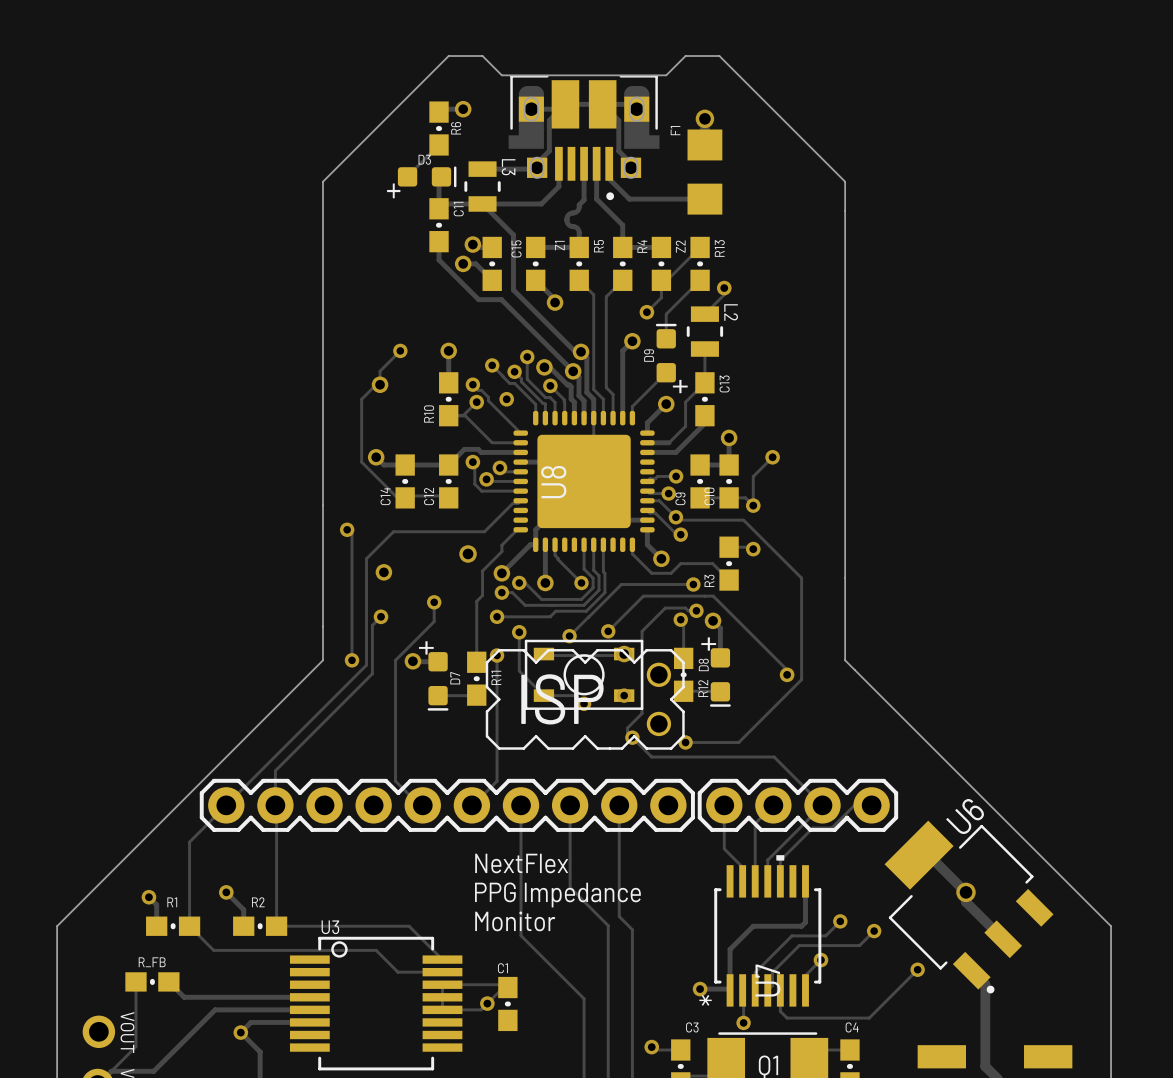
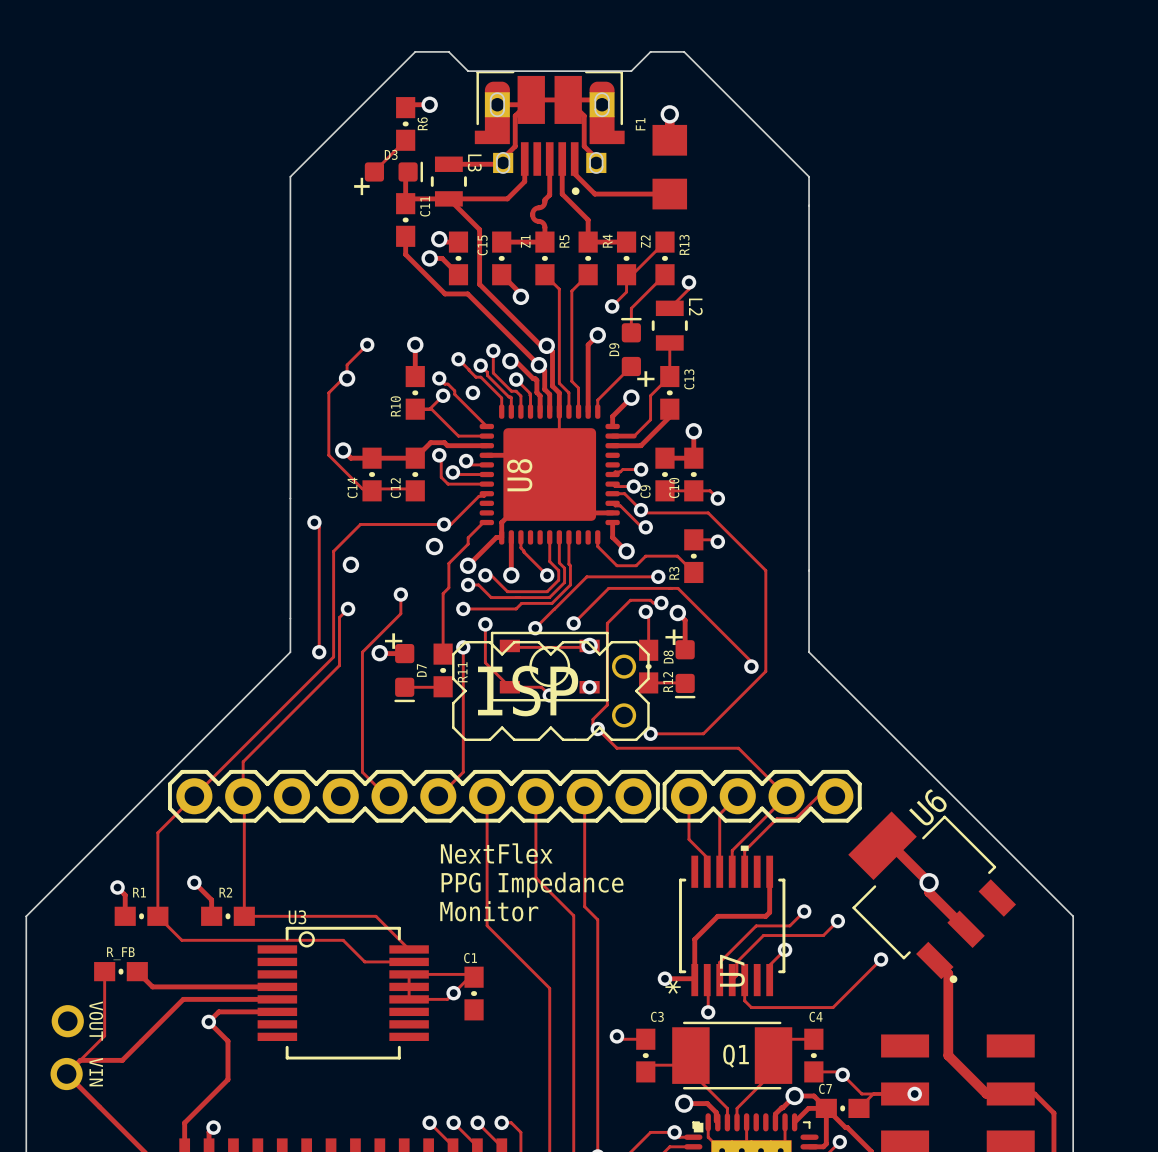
track: (772, 457) (753, 476) (753, 505) -> none
via: (772, 457) -> none
via: none -> (444, 524)

